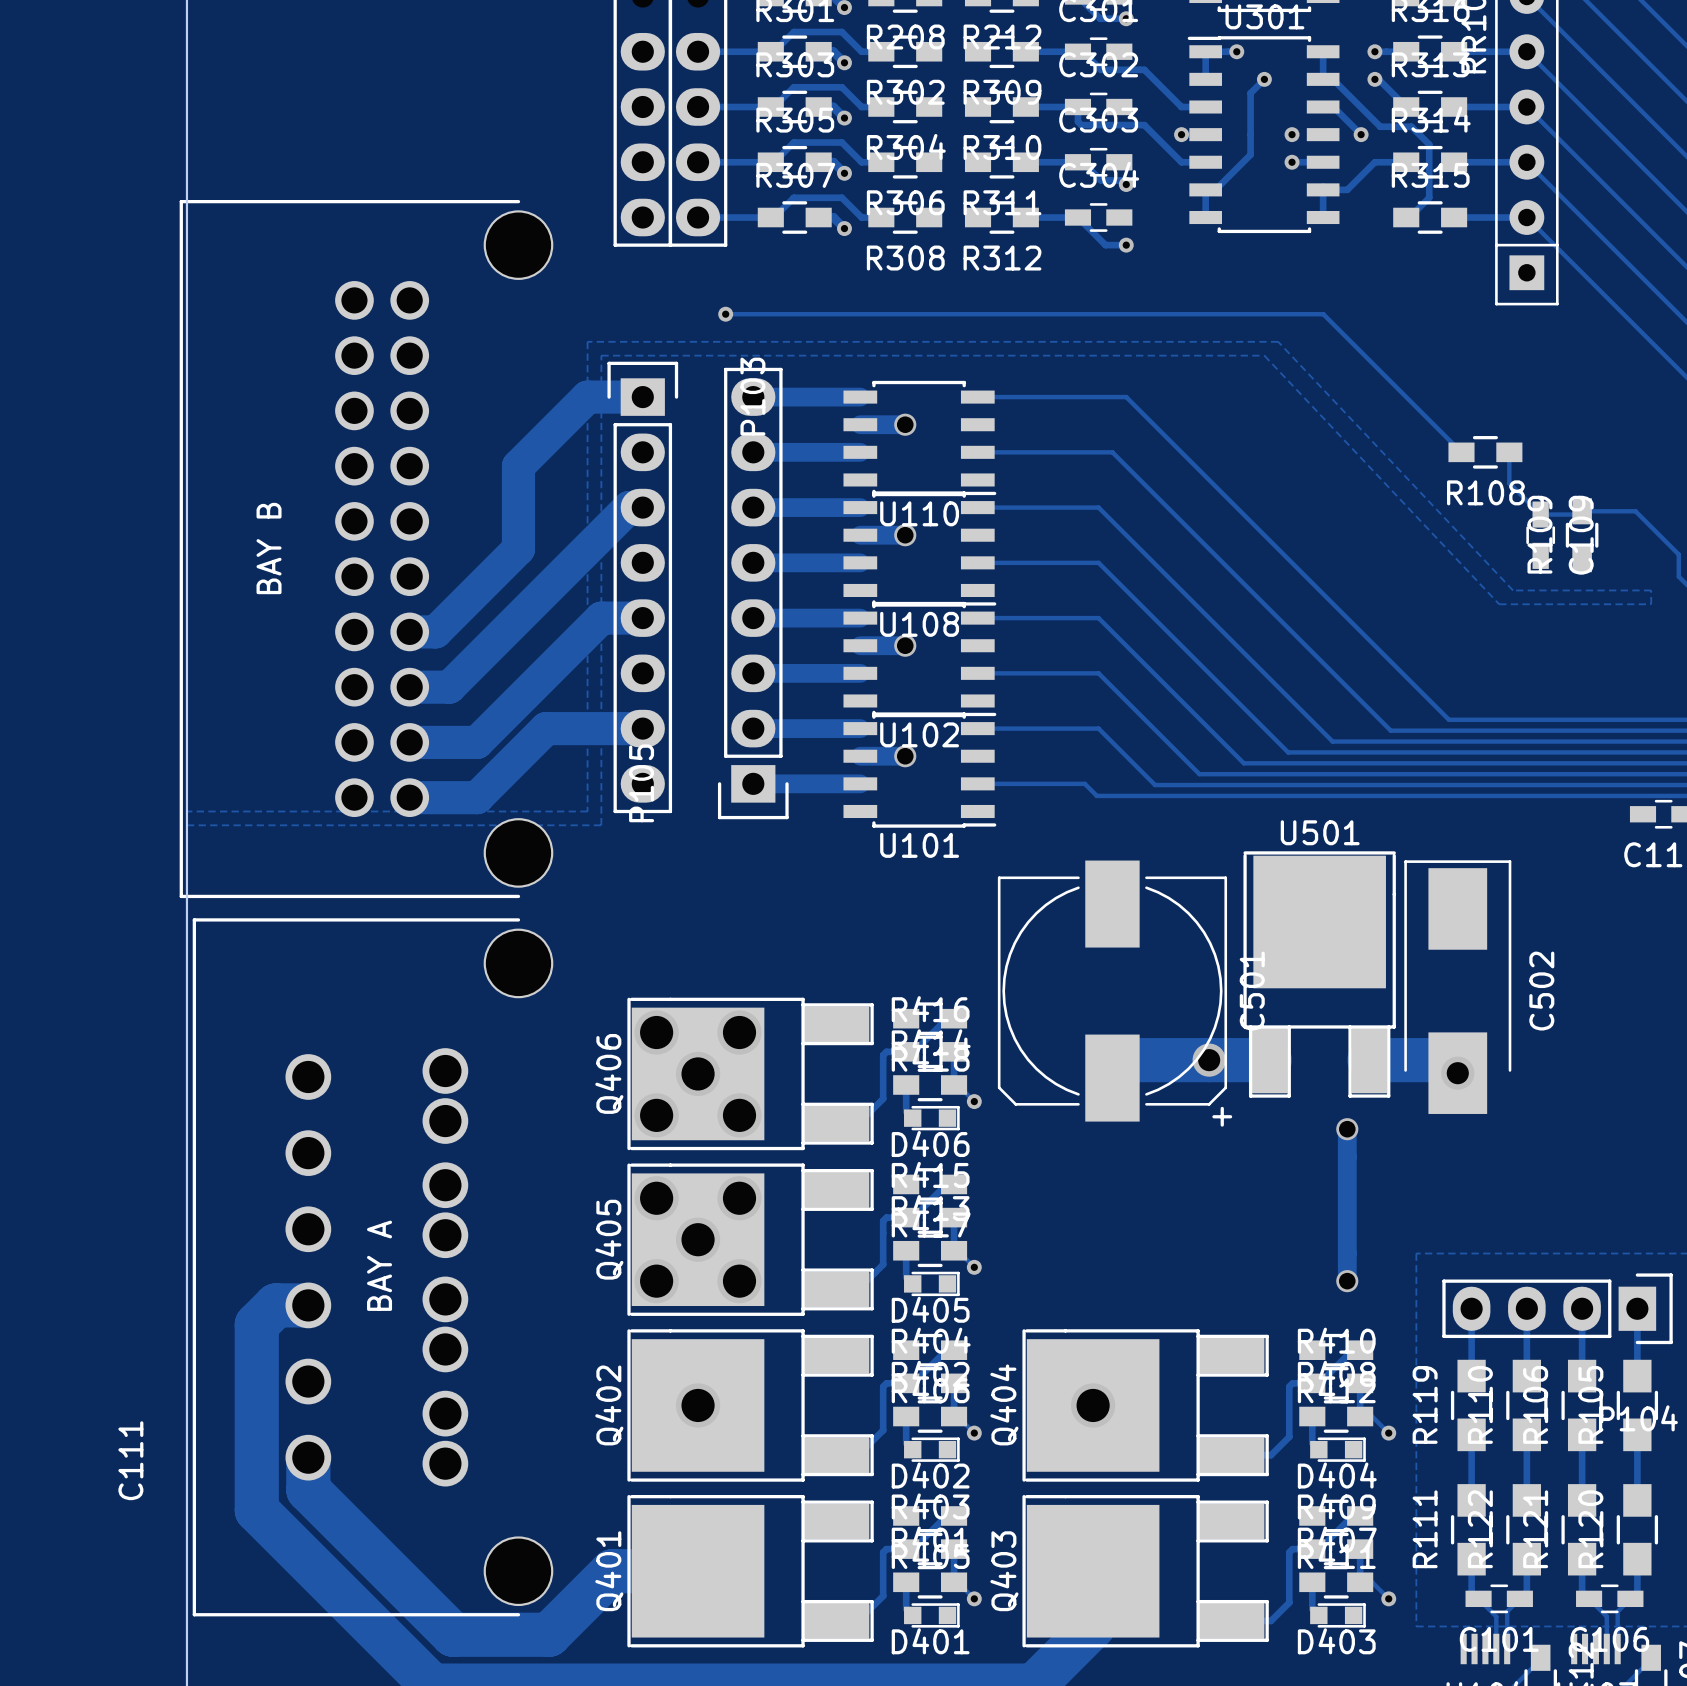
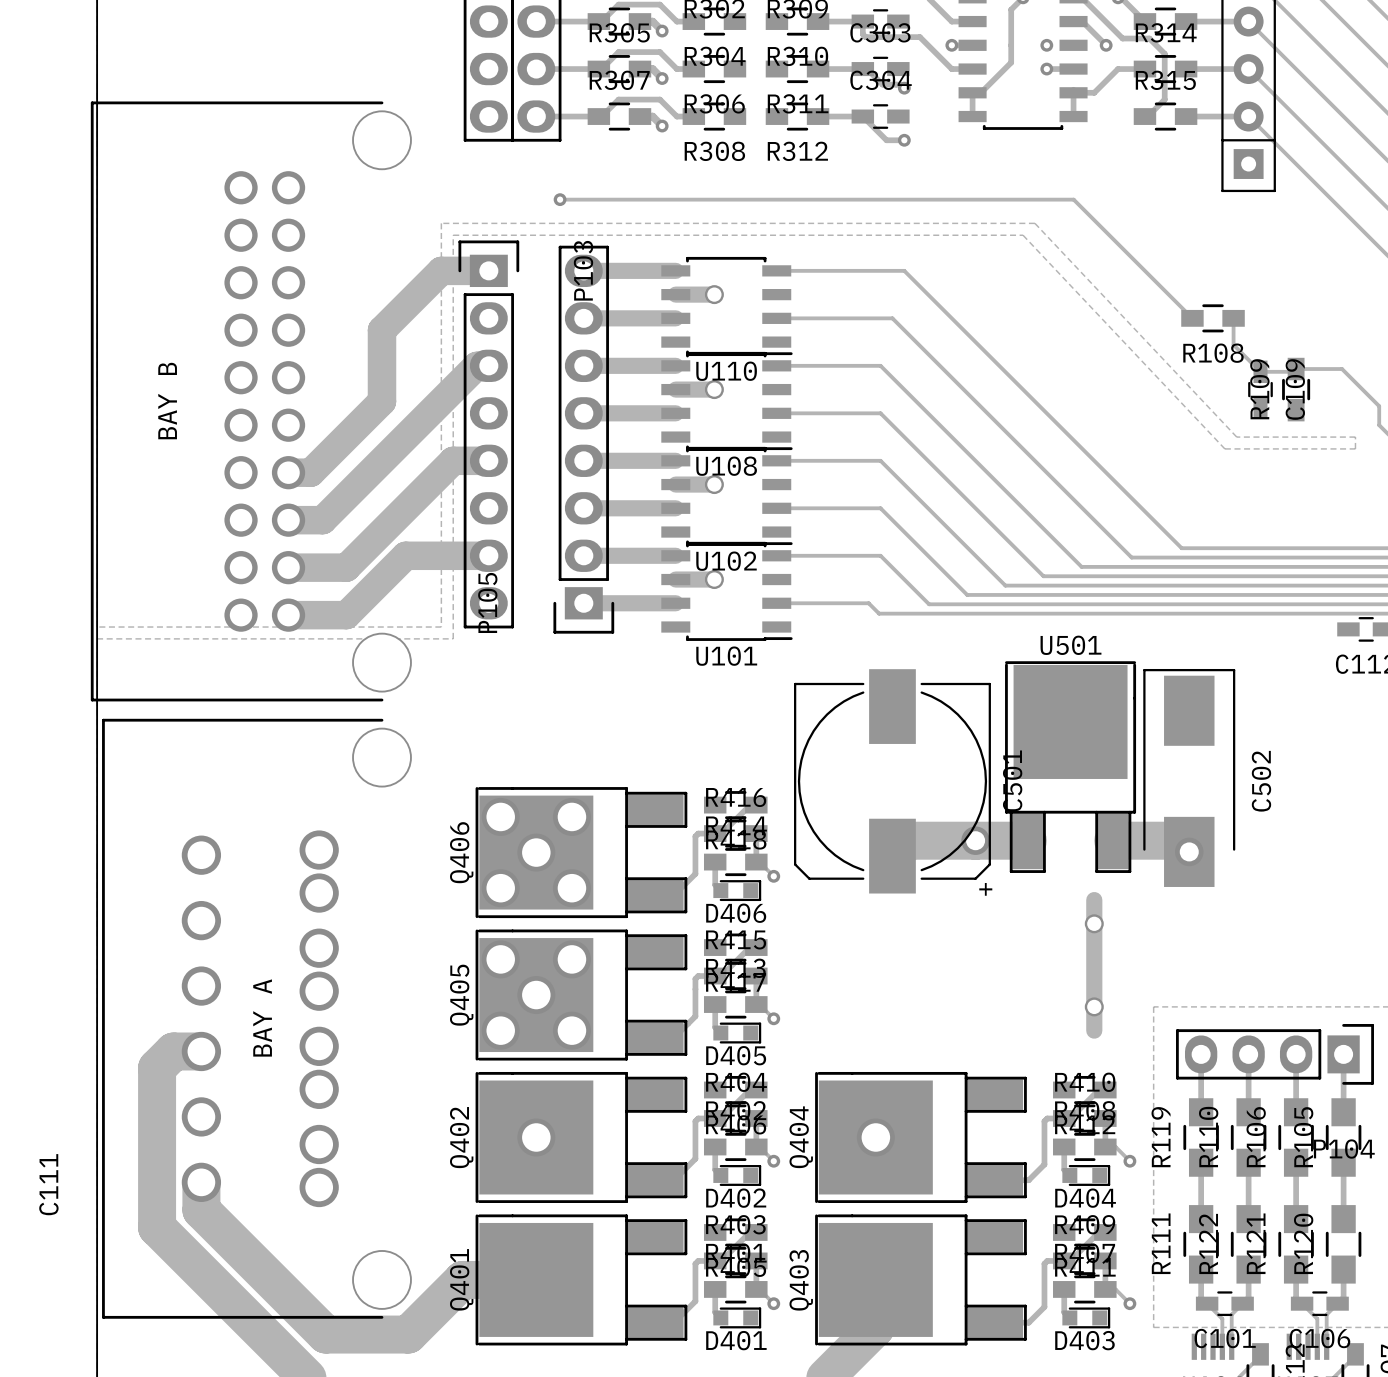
via position: (1347, 1129) -> (1094, 923)
via position: (1347, 1281) -> (1094, 1006)

